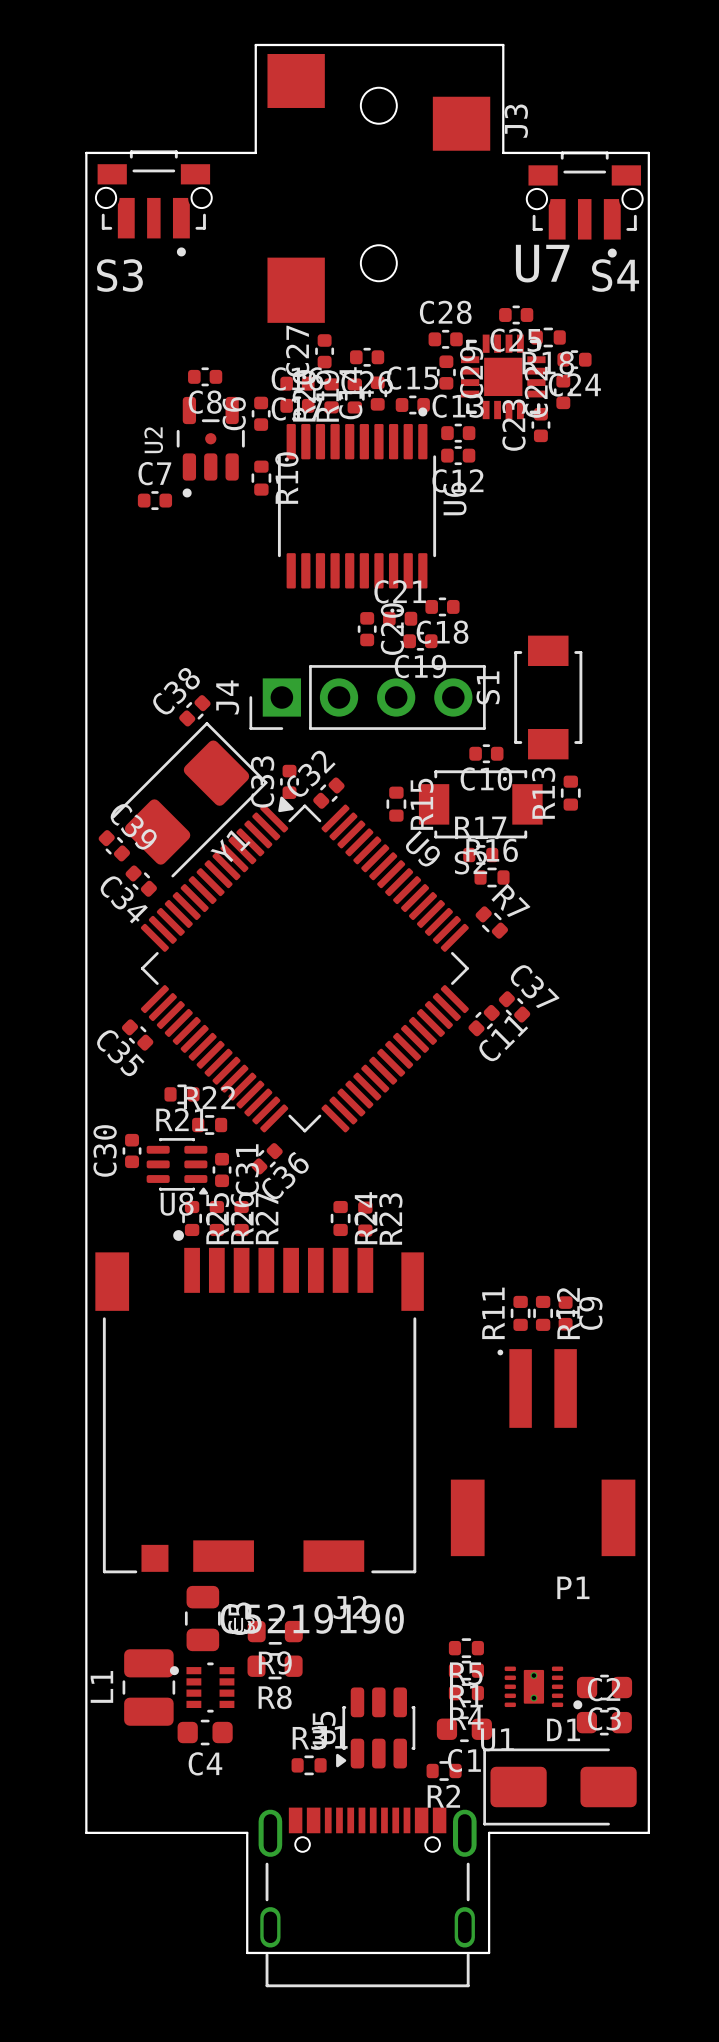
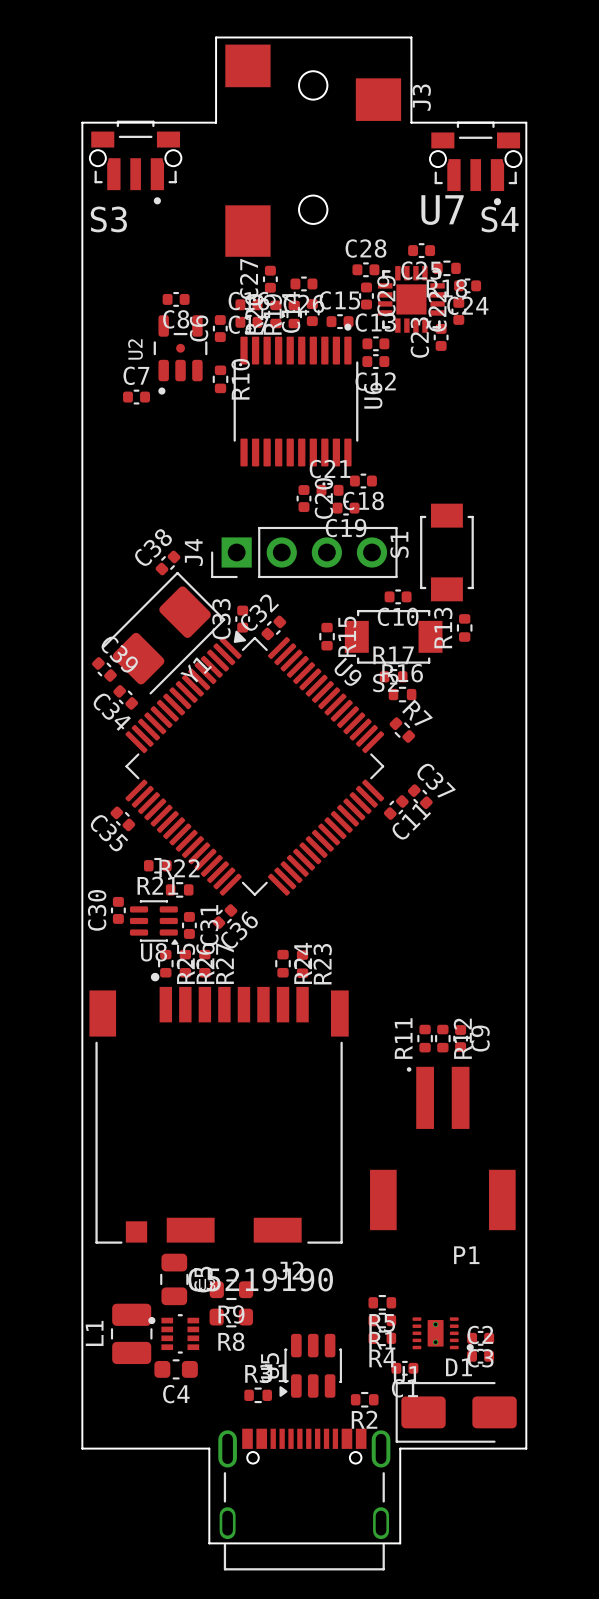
C3 footprint: [576, 1674, 633, 1701] -> [467, 1330, 495, 1346]
C2 footprint: [576, 1709, 632, 1736] -> [467, 1348, 495, 1364]
C1 footprint: [436, 1716, 492, 1743] -> [391, 1360, 419, 1376]

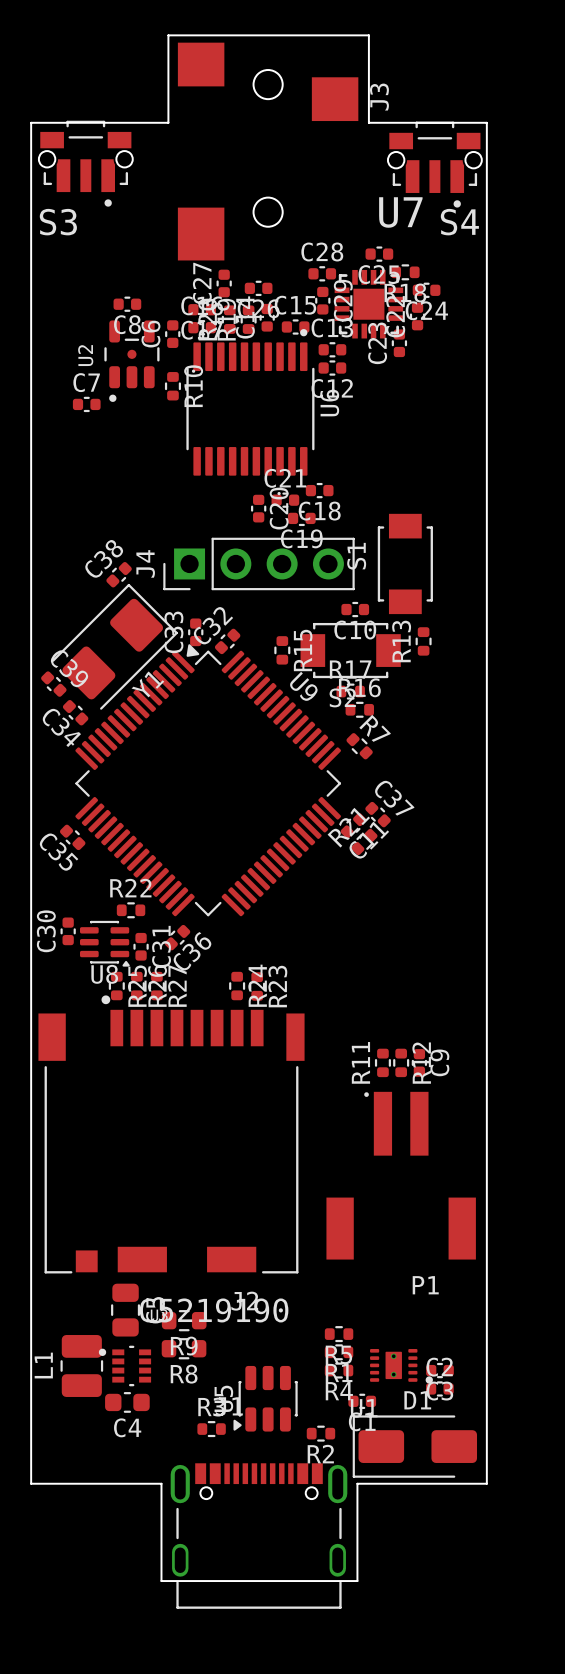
R21 rotation: 0° (157, 865) -> 45° counterclockwise (364, 841)
R21 position: (157, 865) -> (364, 841)
R21 name position: R21 (157, 885) -> R21 (348, 827)

